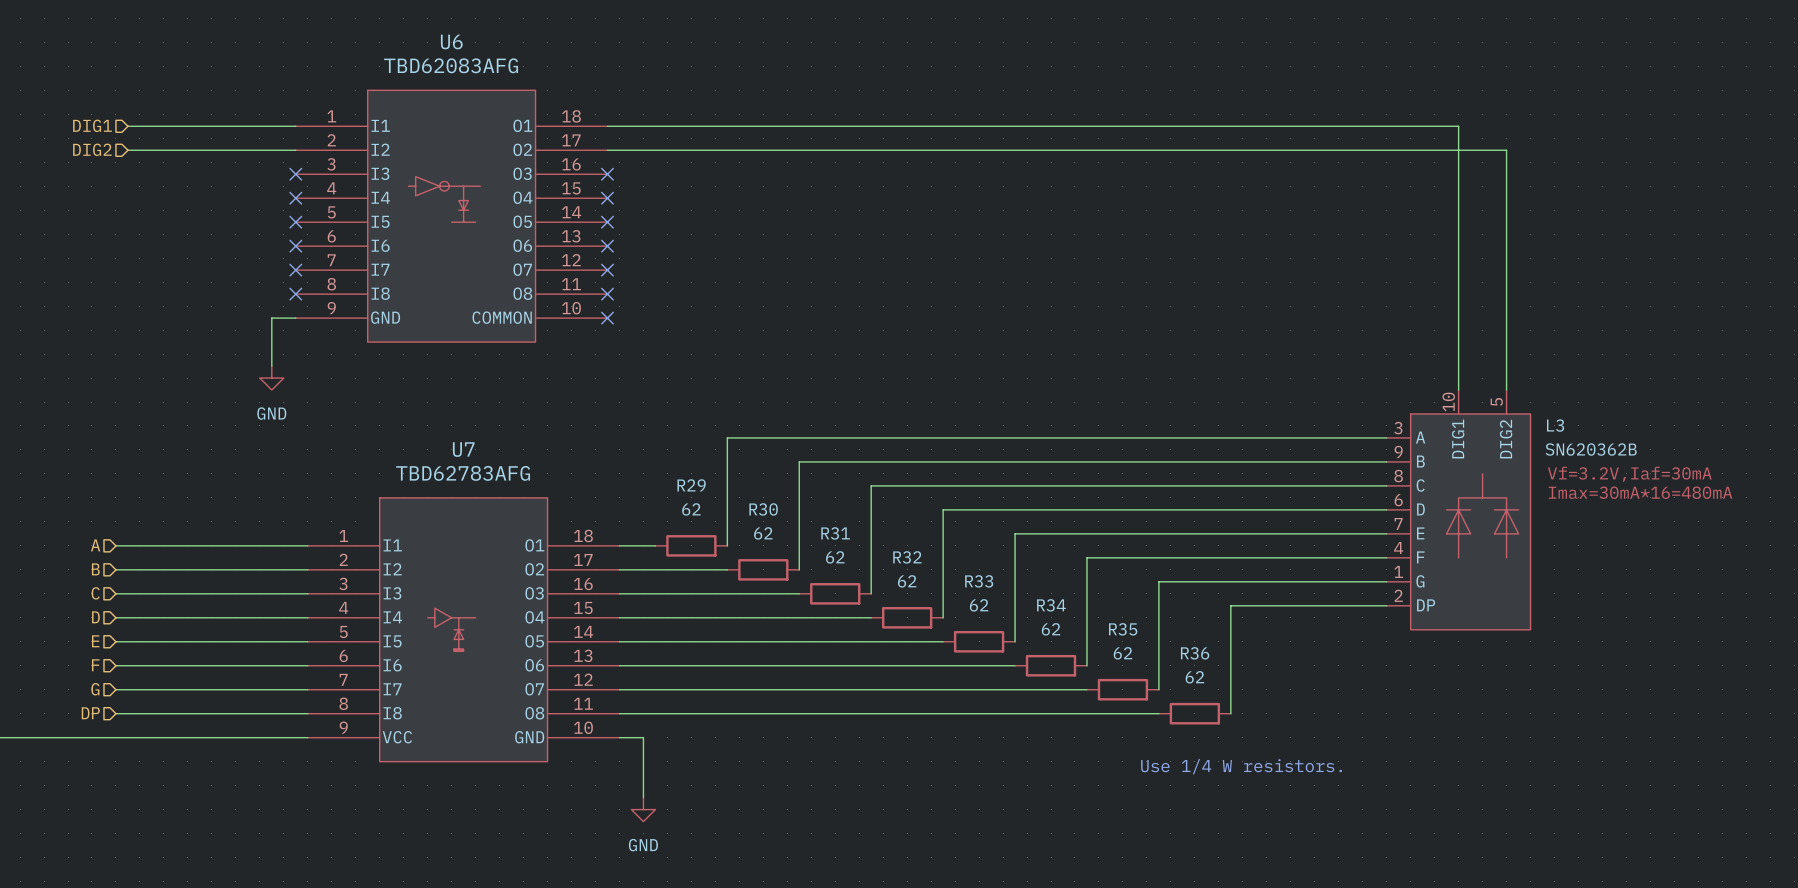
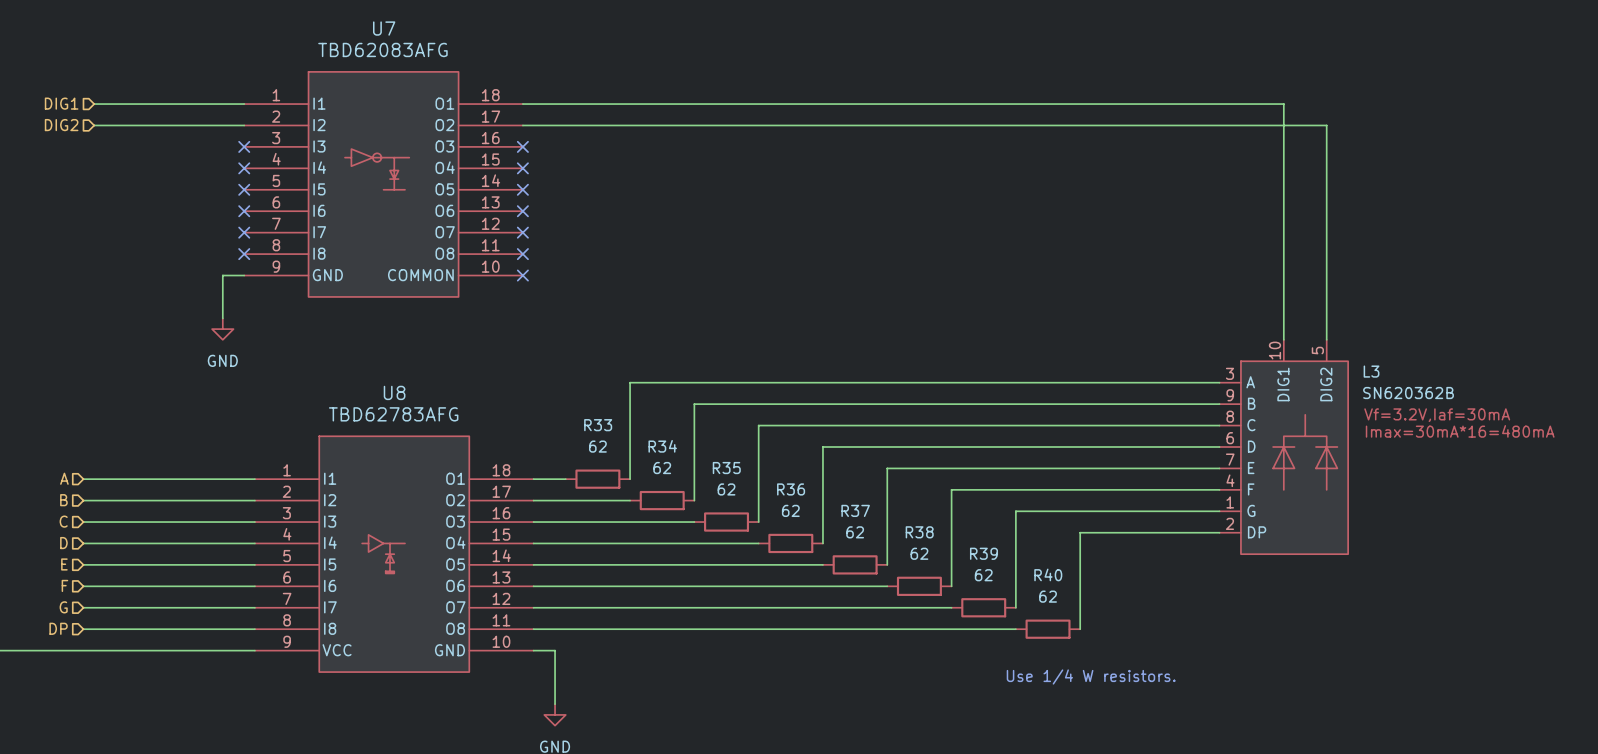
U6 name: U6 (451, 41) -> U7 (384, 28)
U7 name: U7 (463, 449) -> U8 (394, 392)
R29 name: R29 (691, 485) -> R33 (598, 425)
R30 name: R30 (763, 509) -> R34 (662, 446)
R31 name: R31 (835, 533) -> R35 (726, 468)
R32 name: R32 (907, 557) -> R36 (791, 489)
R33 name: R33 (979, 581) -> R37 (855, 510)
R34 name: R34 (1051, 605) -> R38 (919, 532)
R35 name: R35 (1123, 629) -> R39 (983, 553)
R36 name: R36 (1195, 653) -> R40 (1048, 574)

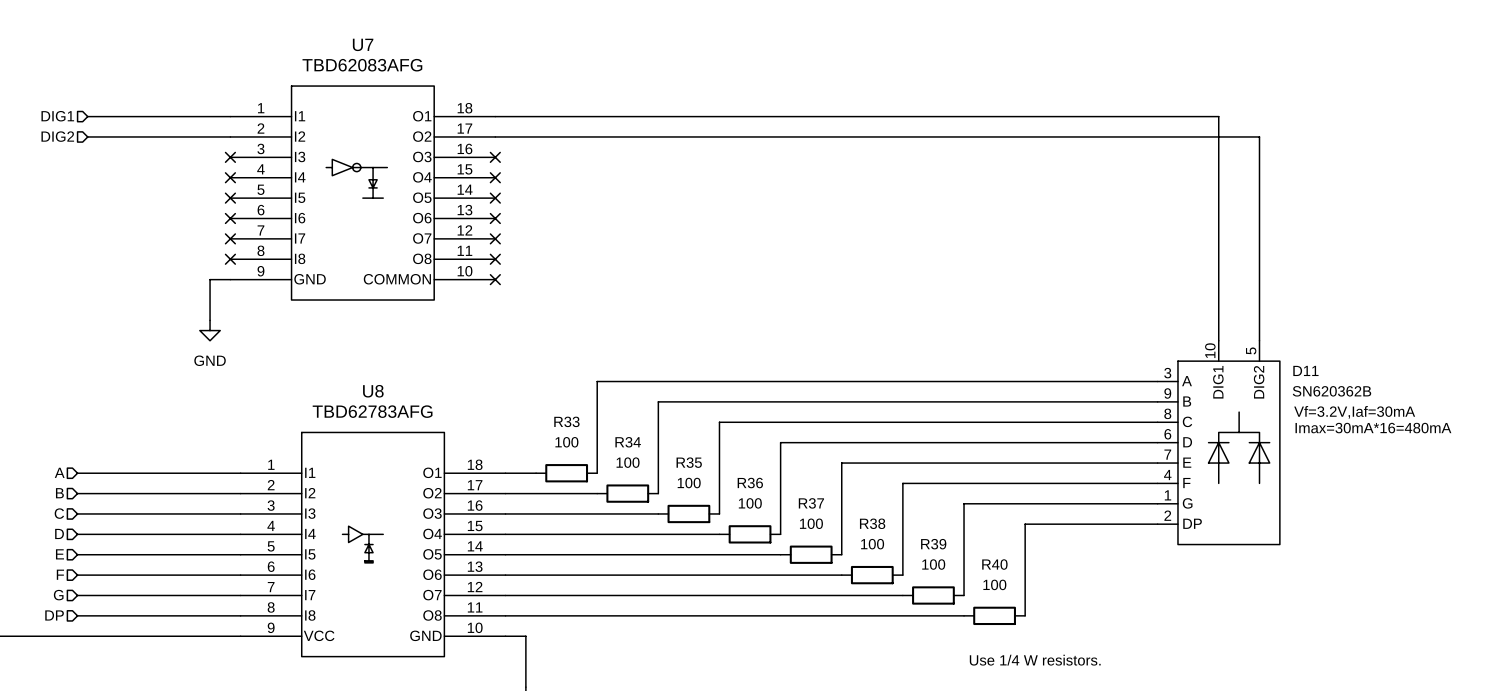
L3 name: L3 (1371, 371) -> D11 (1305, 370)
R33 value: 62 (597, 446) -> 100 (566, 442)
R34 value: 62 (662, 468) -> 100 (628, 462)
R35 value: 62 (726, 489) -> 100 (689, 483)
R36 value: 62 (790, 510) -> 100 (750, 503)
R37 value: 62 (855, 532) -> 100 (811, 523)
R38 value: 62 (919, 553) -> 100 (872, 544)
R39 value: 62 (983, 575) -> 100 (933, 564)
R40 value: 62 (1048, 596) -> 100 (994, 584)

